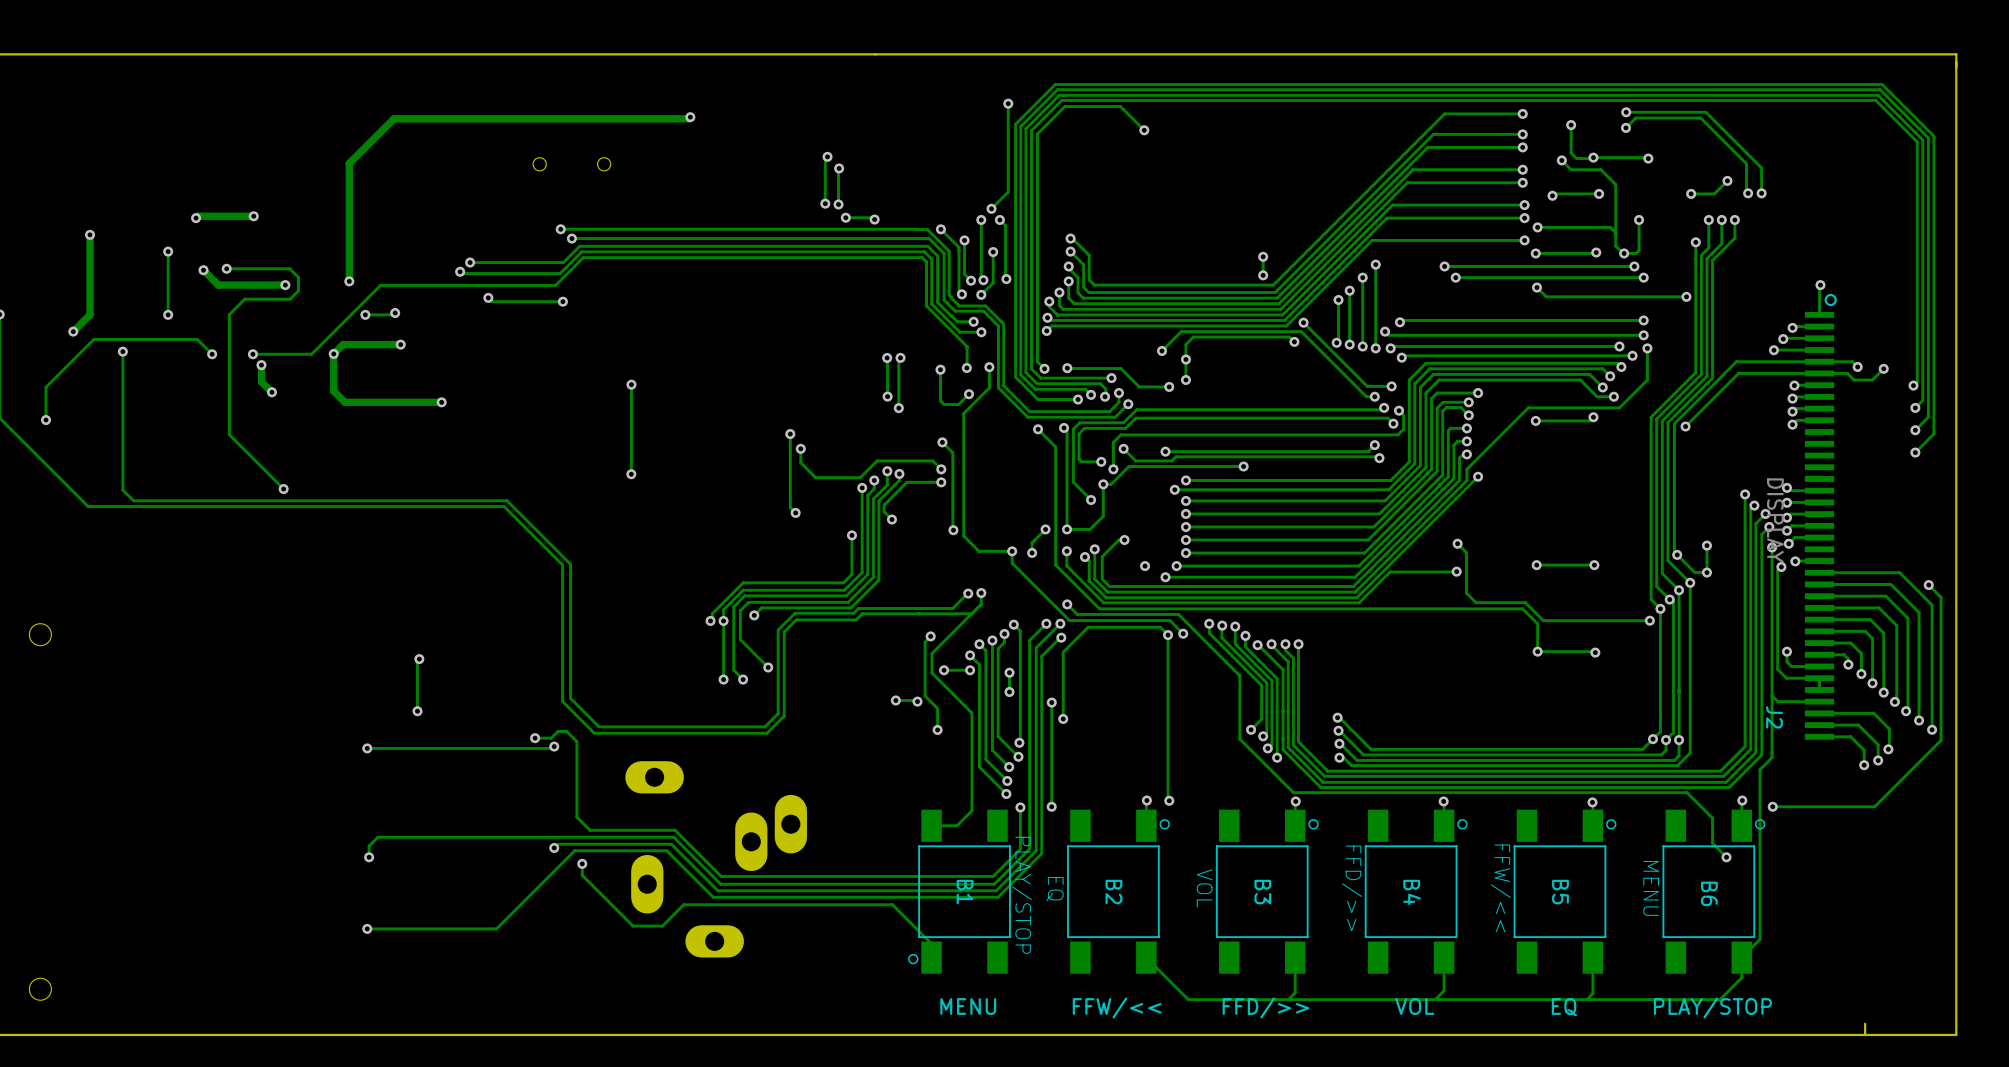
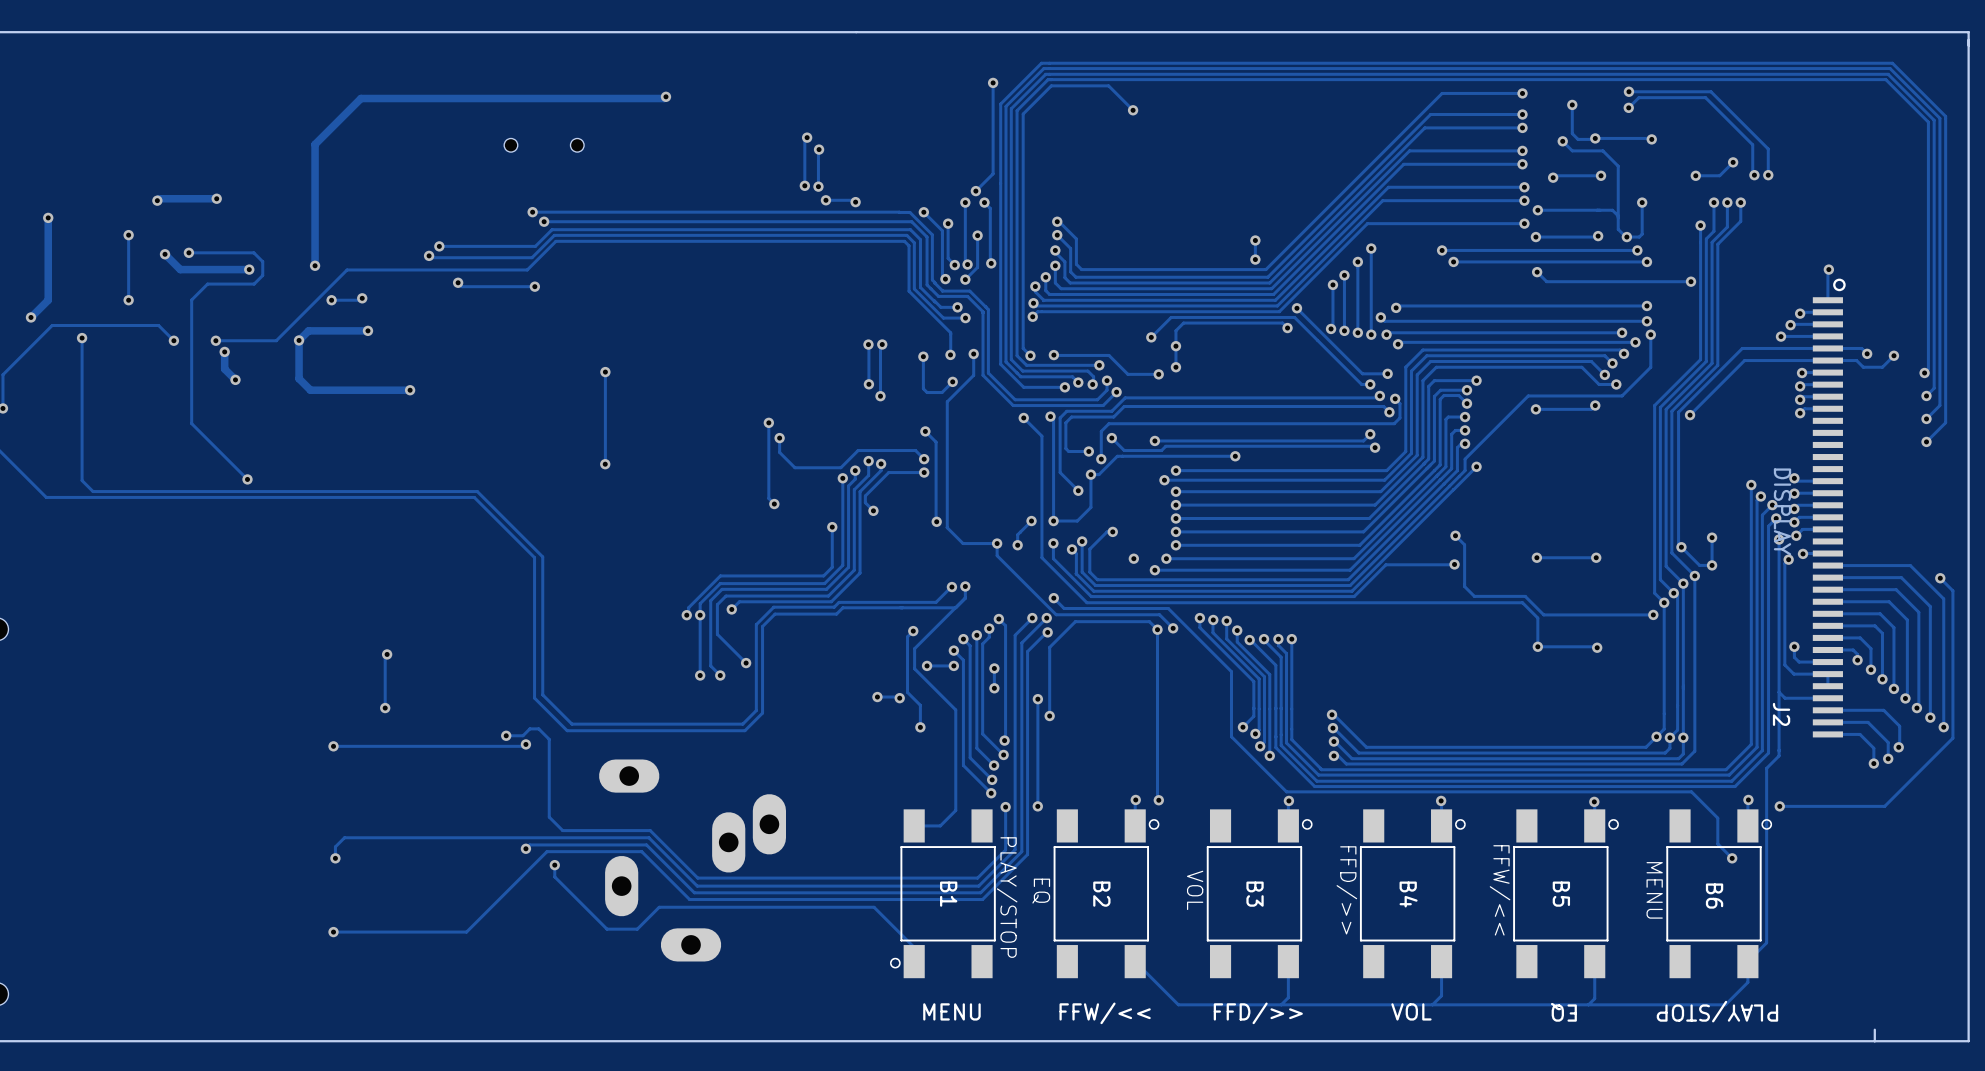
text rotation: 0° (1564, 1007) -> 180° (1563, 1012)
text rotation: 0° (1712, 1007) -> 180° (1717, 1011)

